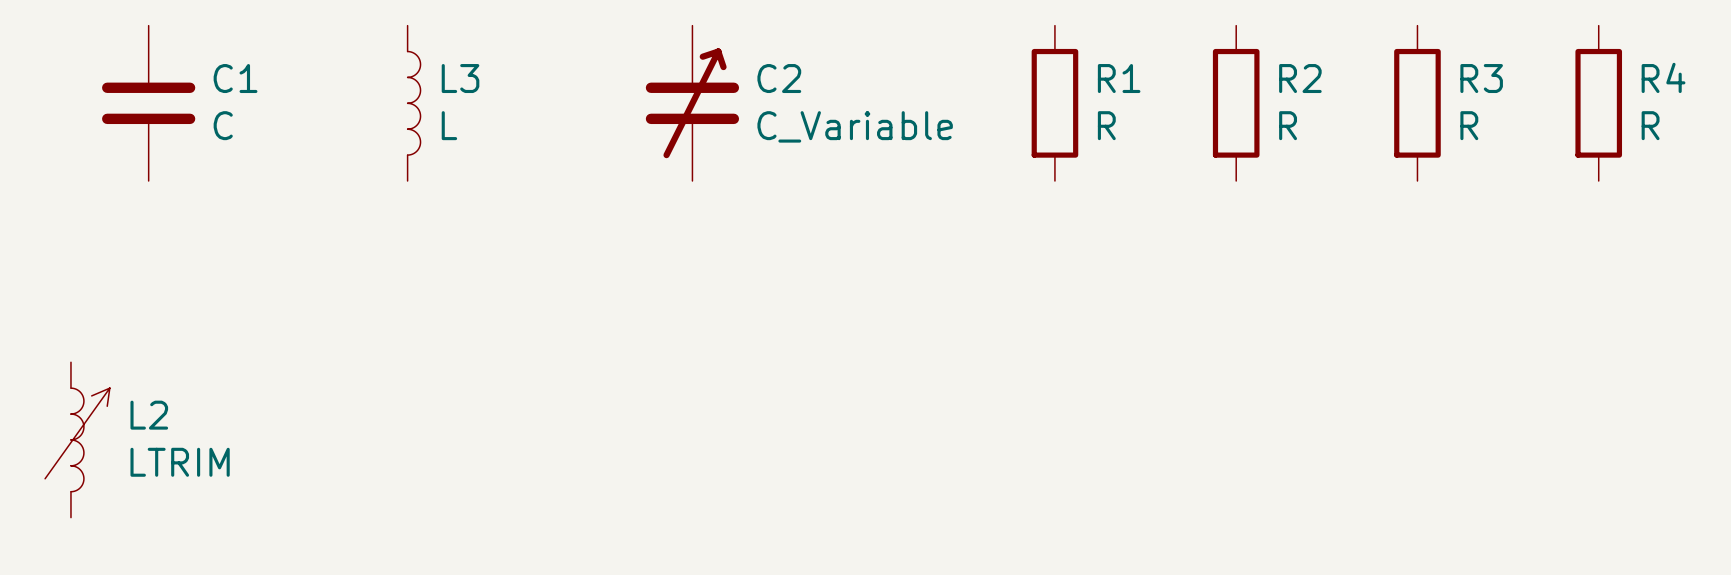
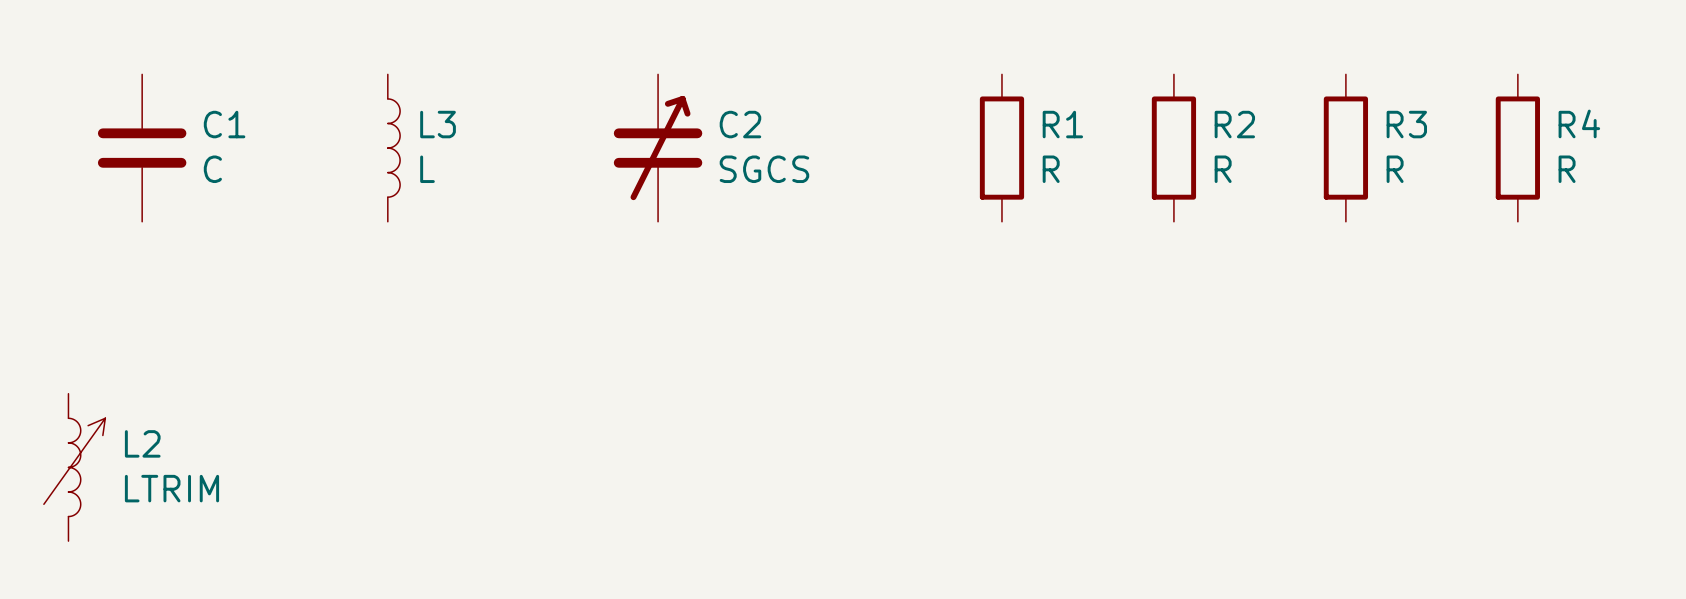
C2 value: C_Variable (855, 126) -> SGCS (764, 169)

